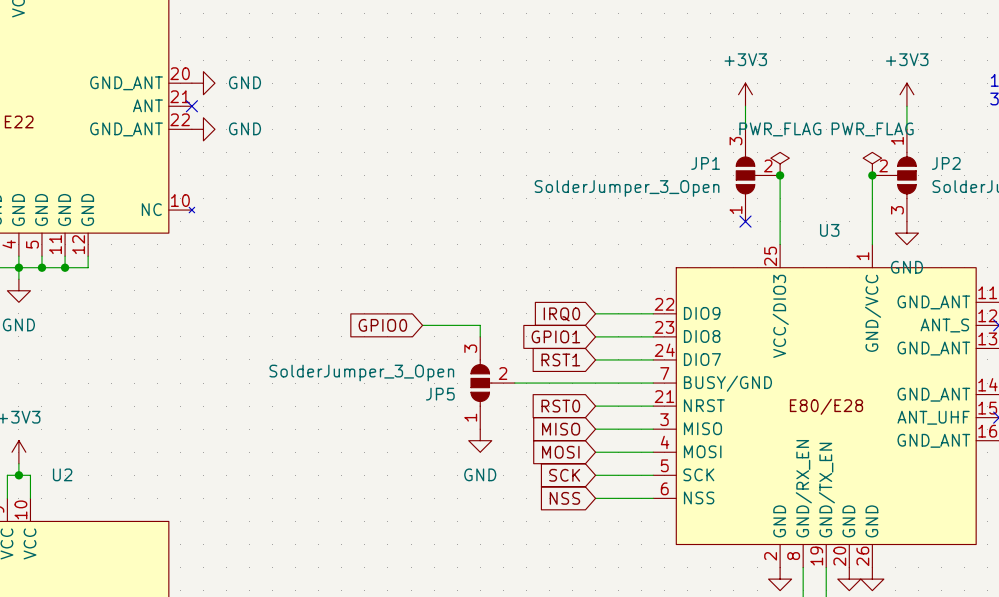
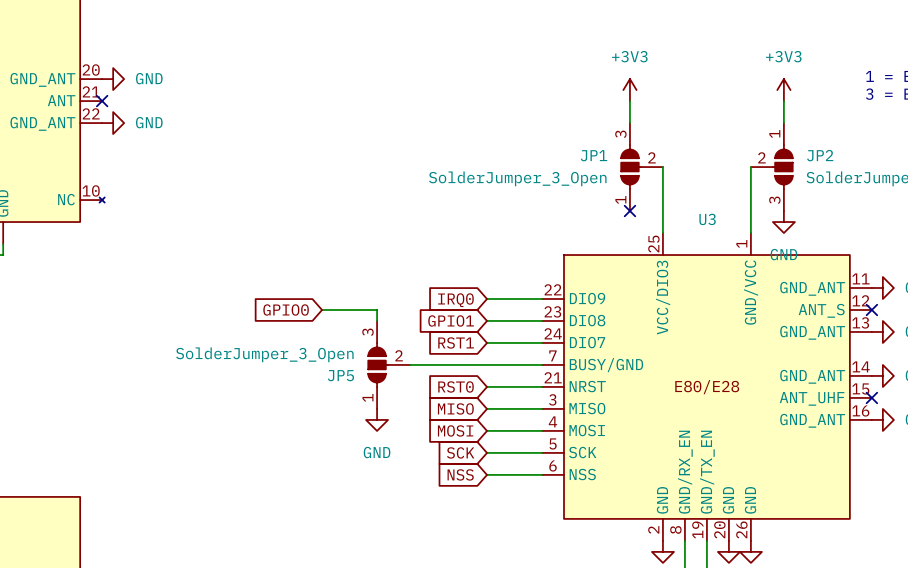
power symbol: PWR_FLAG (780, 163) -> none
power symbol: PWR_FLAG (872, 163) -> none
junction: (780, 175) -> none
junction: (872, 175) -> none

